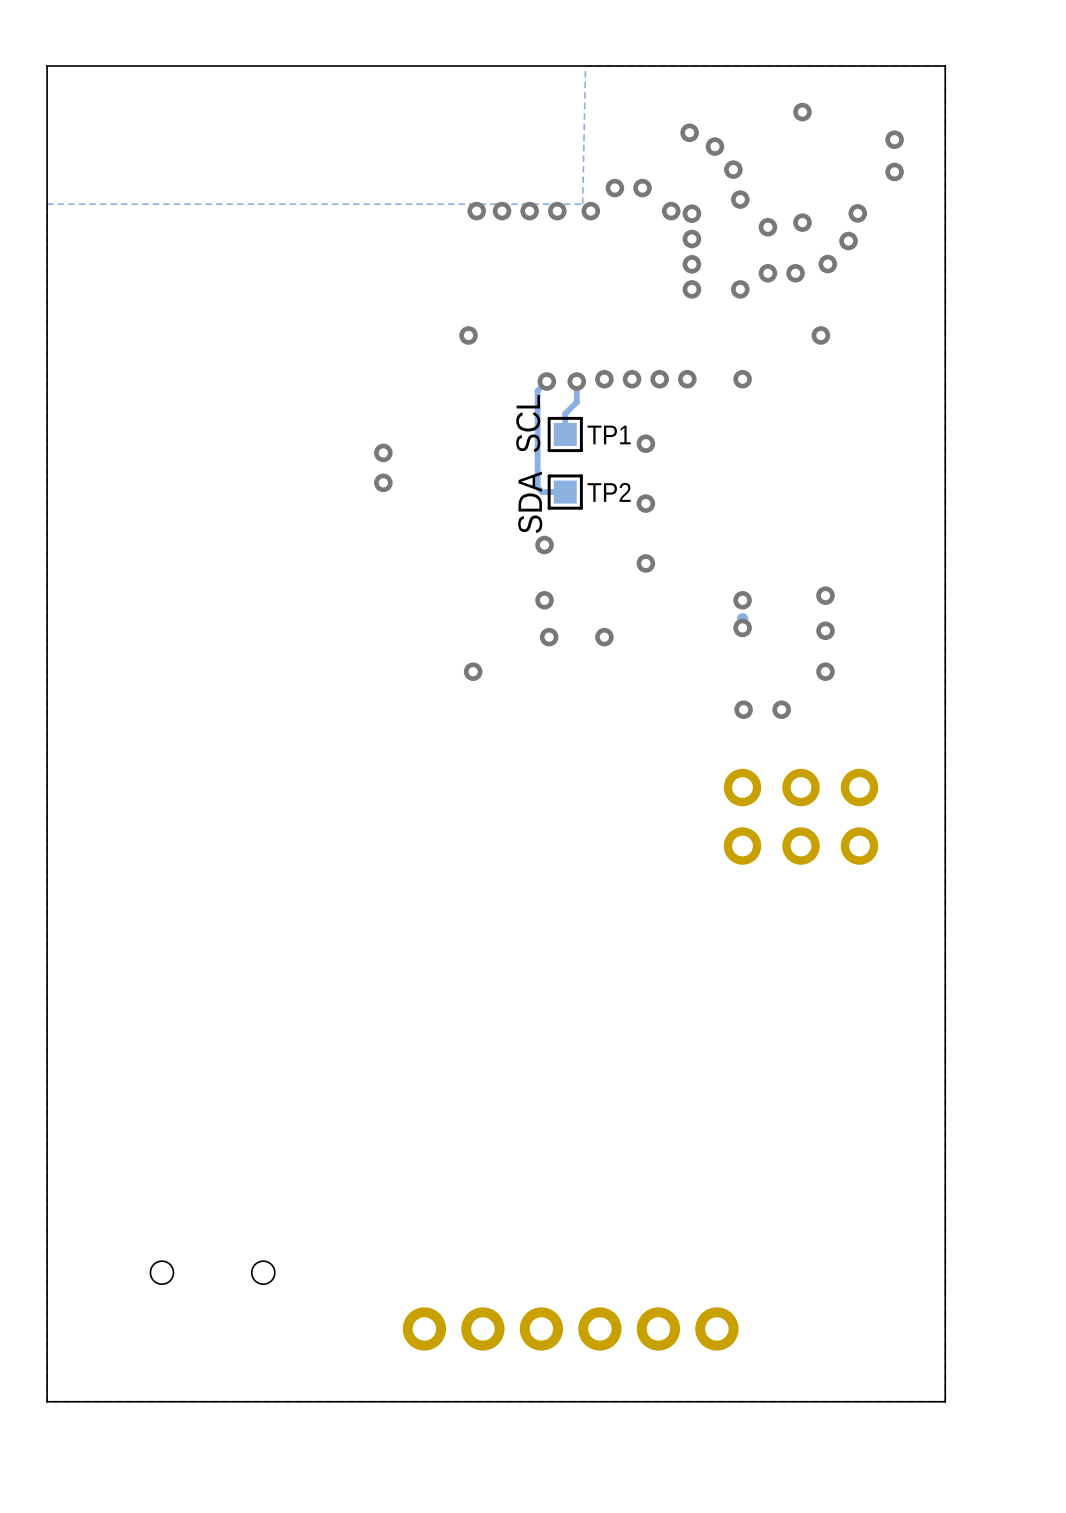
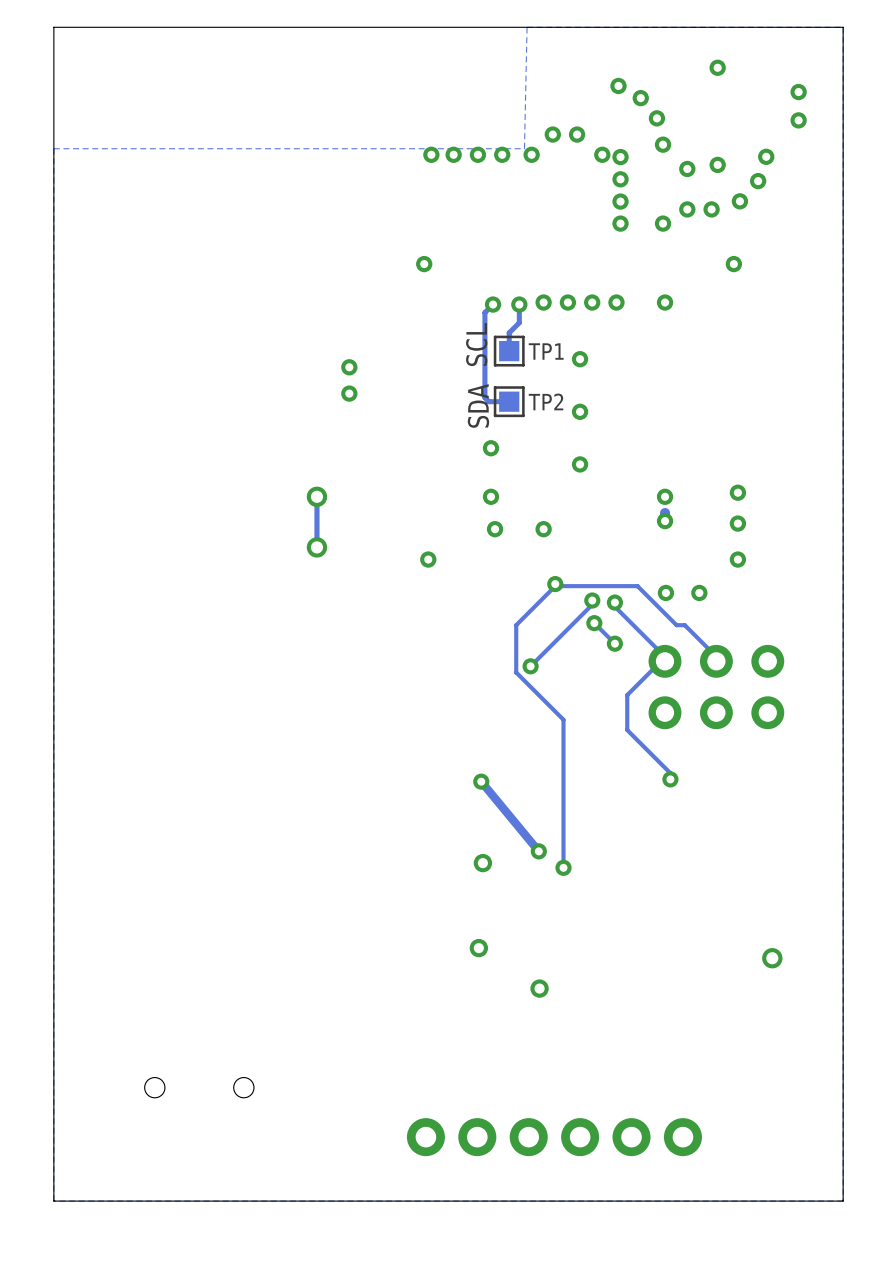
track: none -> (316, 496) (316, 547)
via: none -> (316, 496)
via: none -> (316, 547)
via: none -> (555, 584)
track: none -> (592, 600) (592, 604) (530, 666)
via: none -> (592, 600)
track: none -> (614, 602) (614, 606) (664, 656) (664, 661) (662, 660) (627, 695) (627, 730) (670, 773) (670, 779)
via: none -> (614, 602)
track: none -> (594, 623) (614, 643)
via: none -> (594, 623)
via: none -> (614, 643)
track: none -> (716, 661) (715, 656) (684, 625) (676, 625) (637, 586) (557, 586) (555, 584) (516, 625) (516, 672) (563, 719) (563, 867)
via: none -> (530, 666)
via: none -> (670, 779)
track: none -> (481, 781) (538, 851)
via: none -> (481, 781)
via: none -> (538, 851)
via: none -> (482, 863)
via: none -> (563, 867)
via: none -> (478, 948)
via: none -> (772, 958)
via: none -> (539, 988)
part position: (570, 1328) -> (554, 1137)

